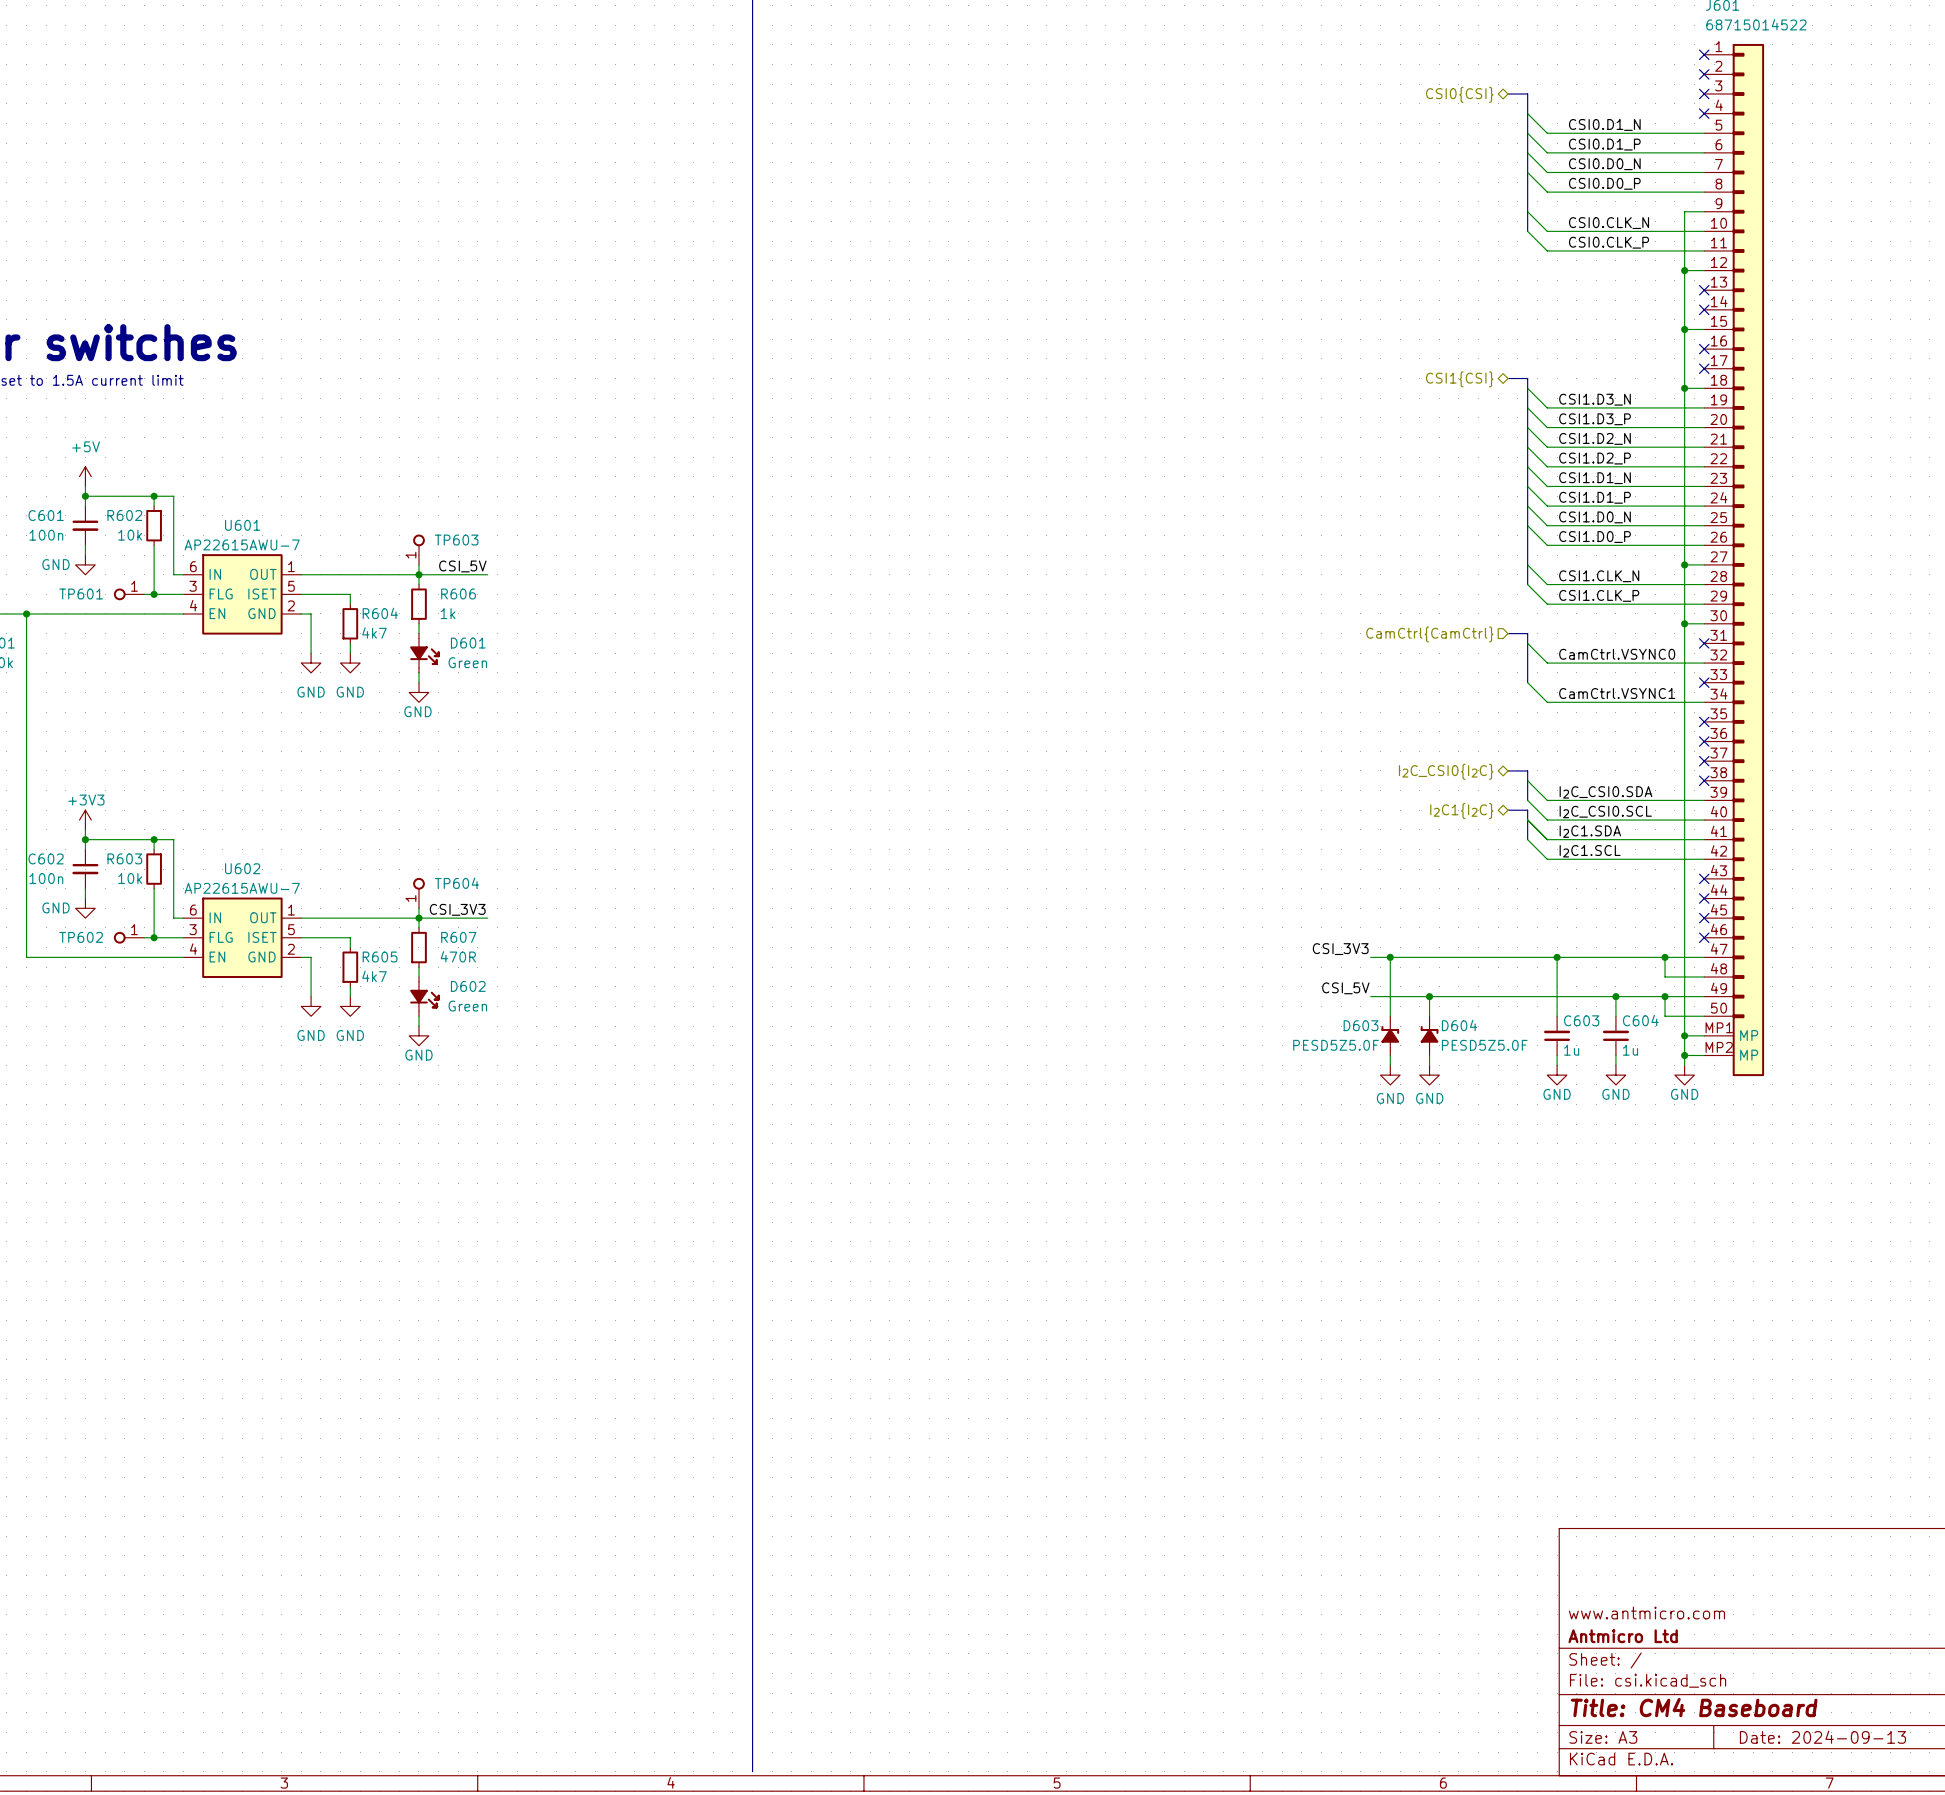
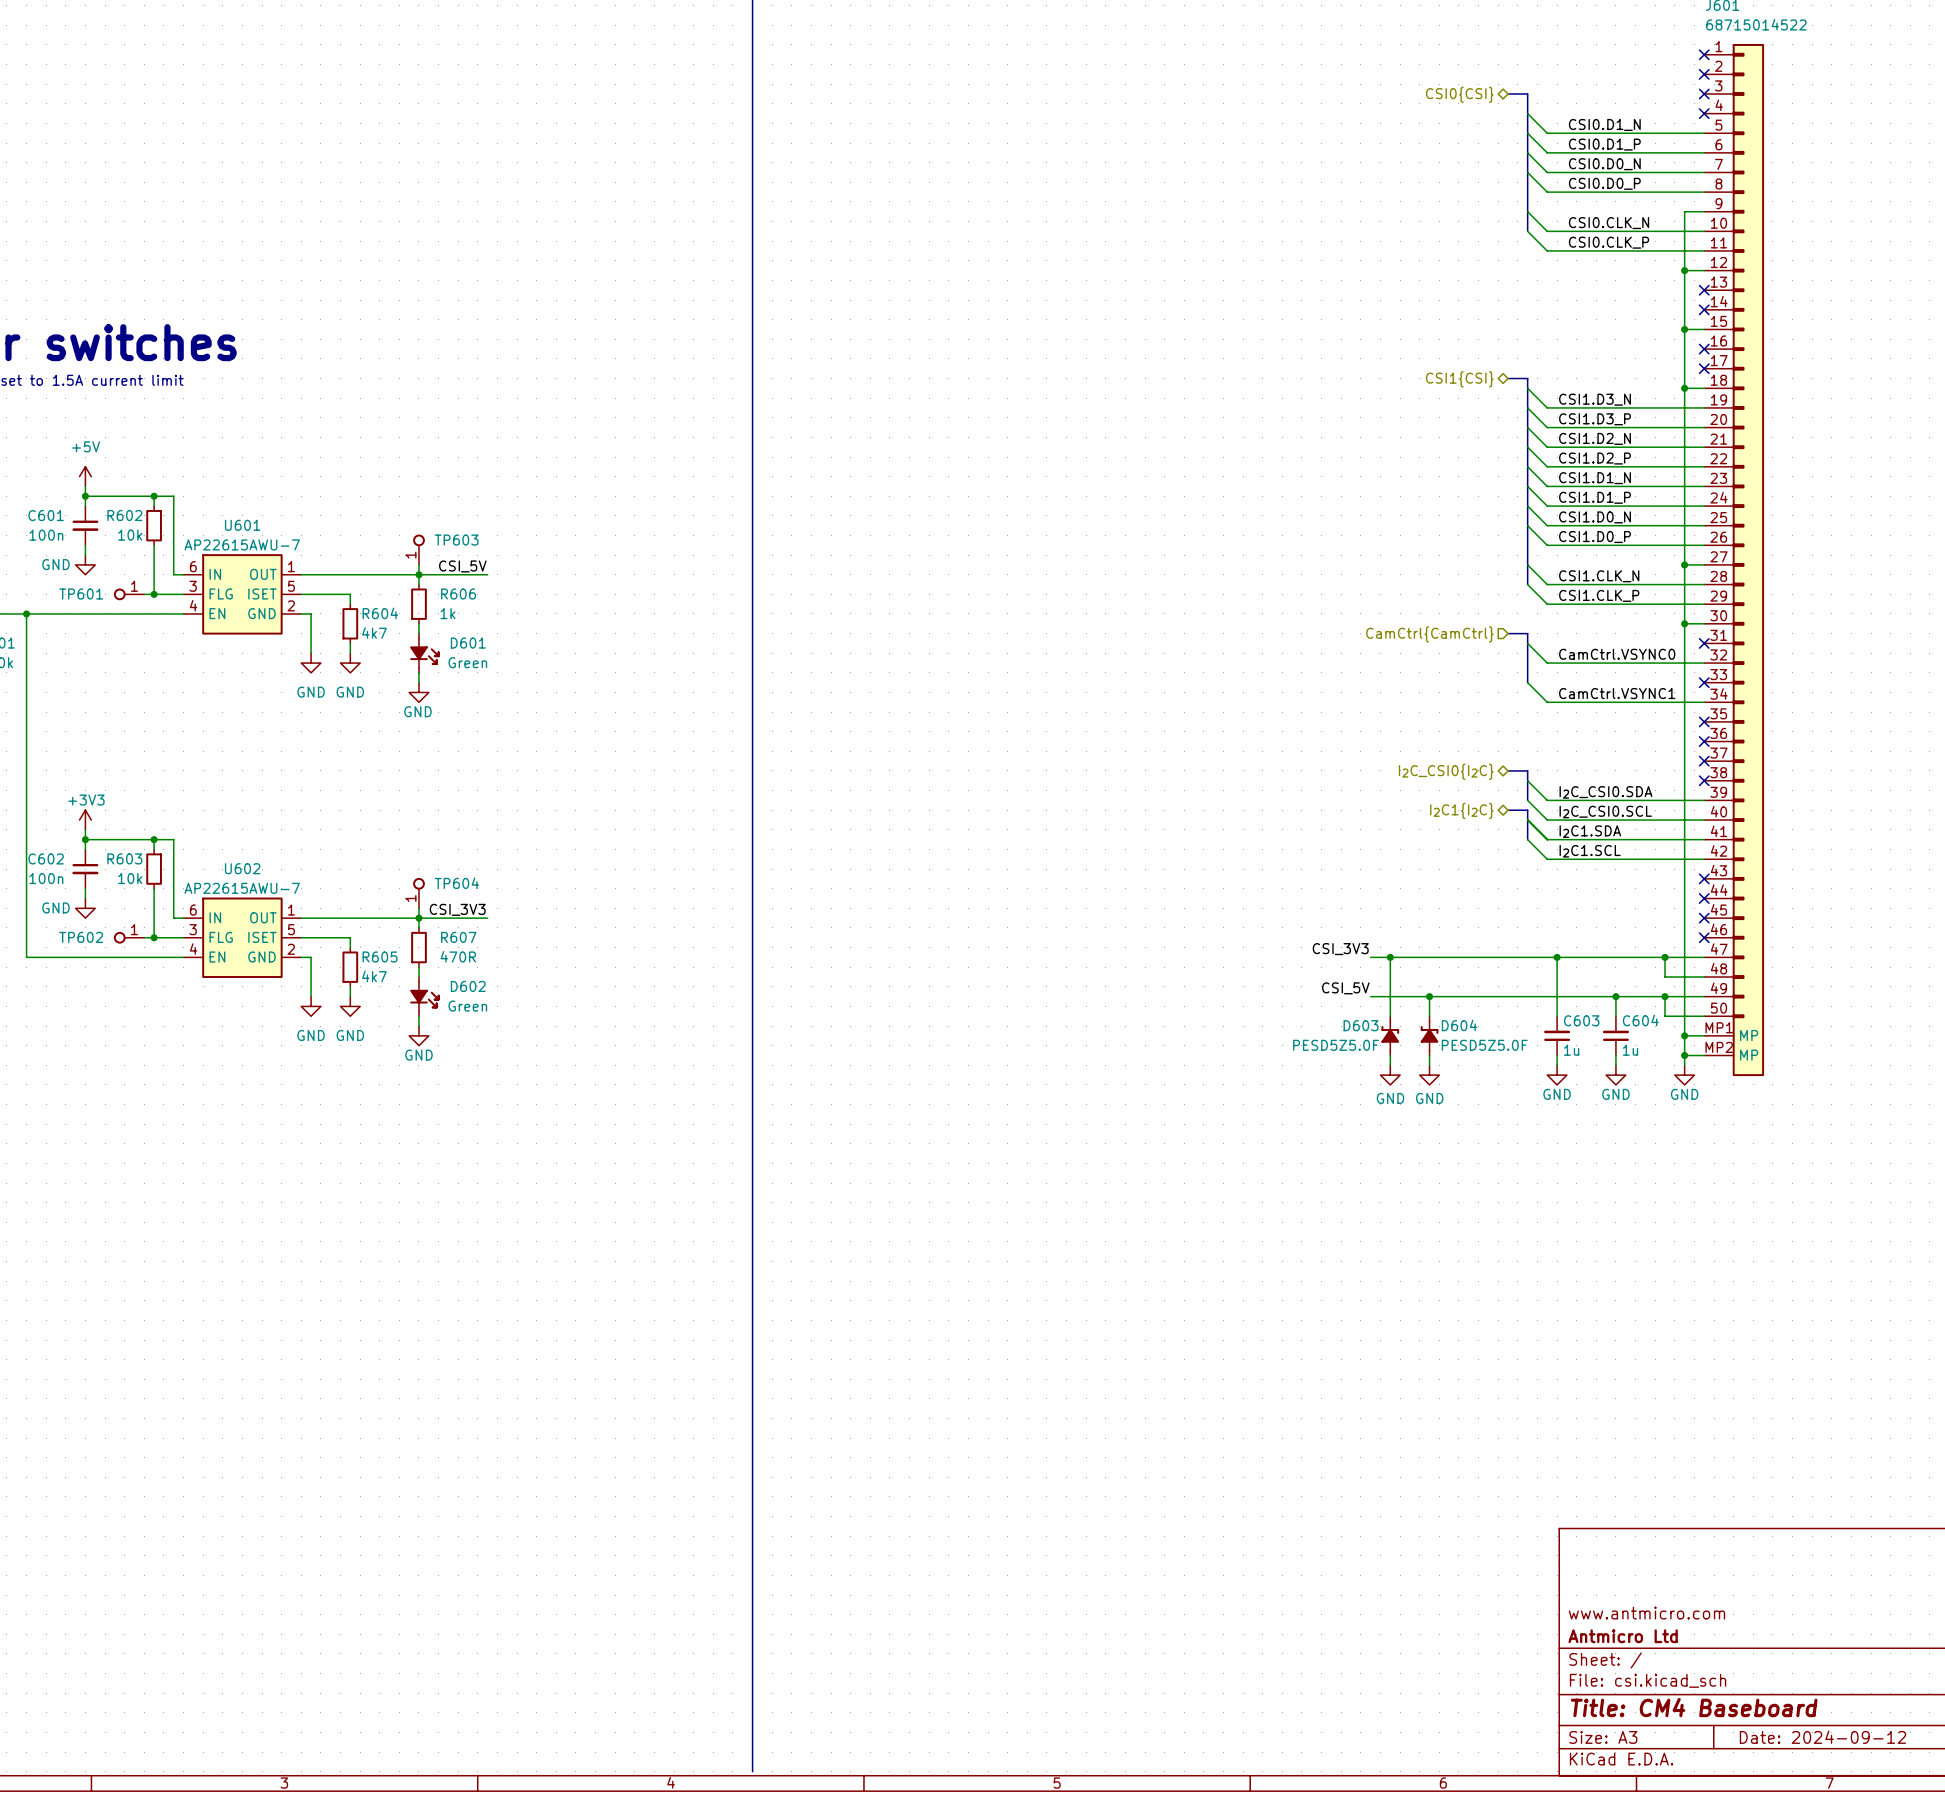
title block: Date: 2024-09-13 (1822, 1737) -> Date: 2024-09-12 (1822, 1737)

